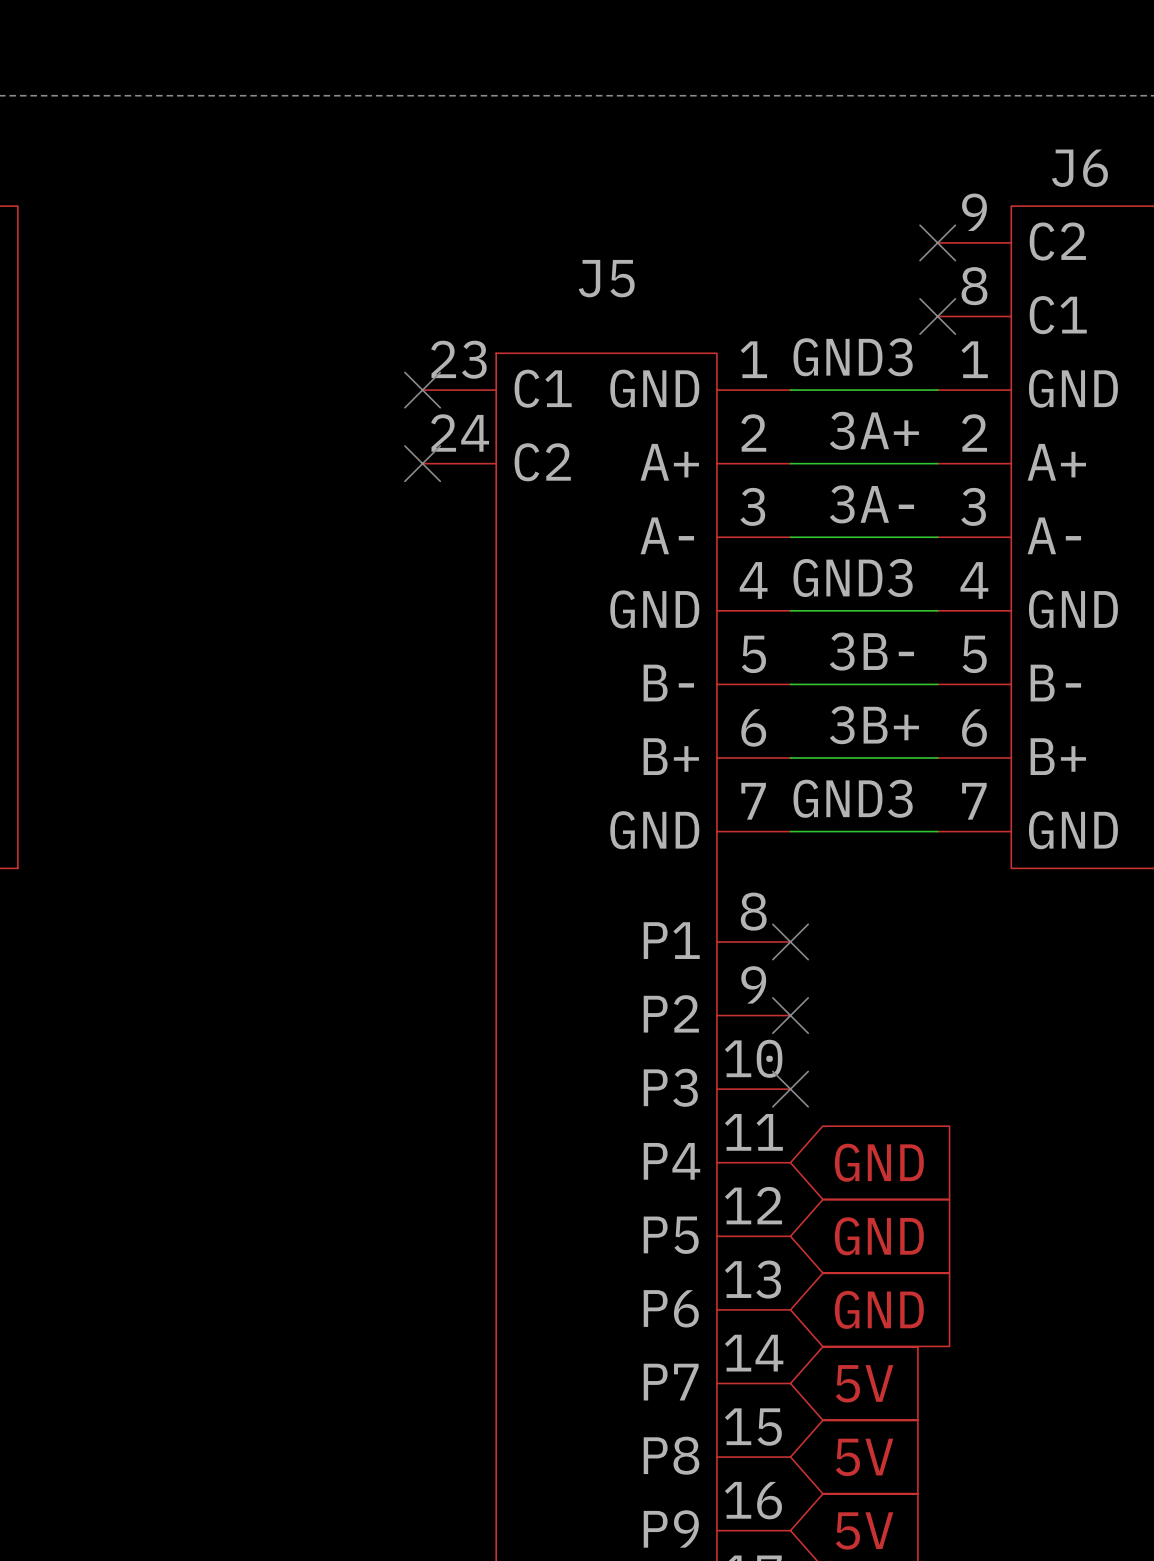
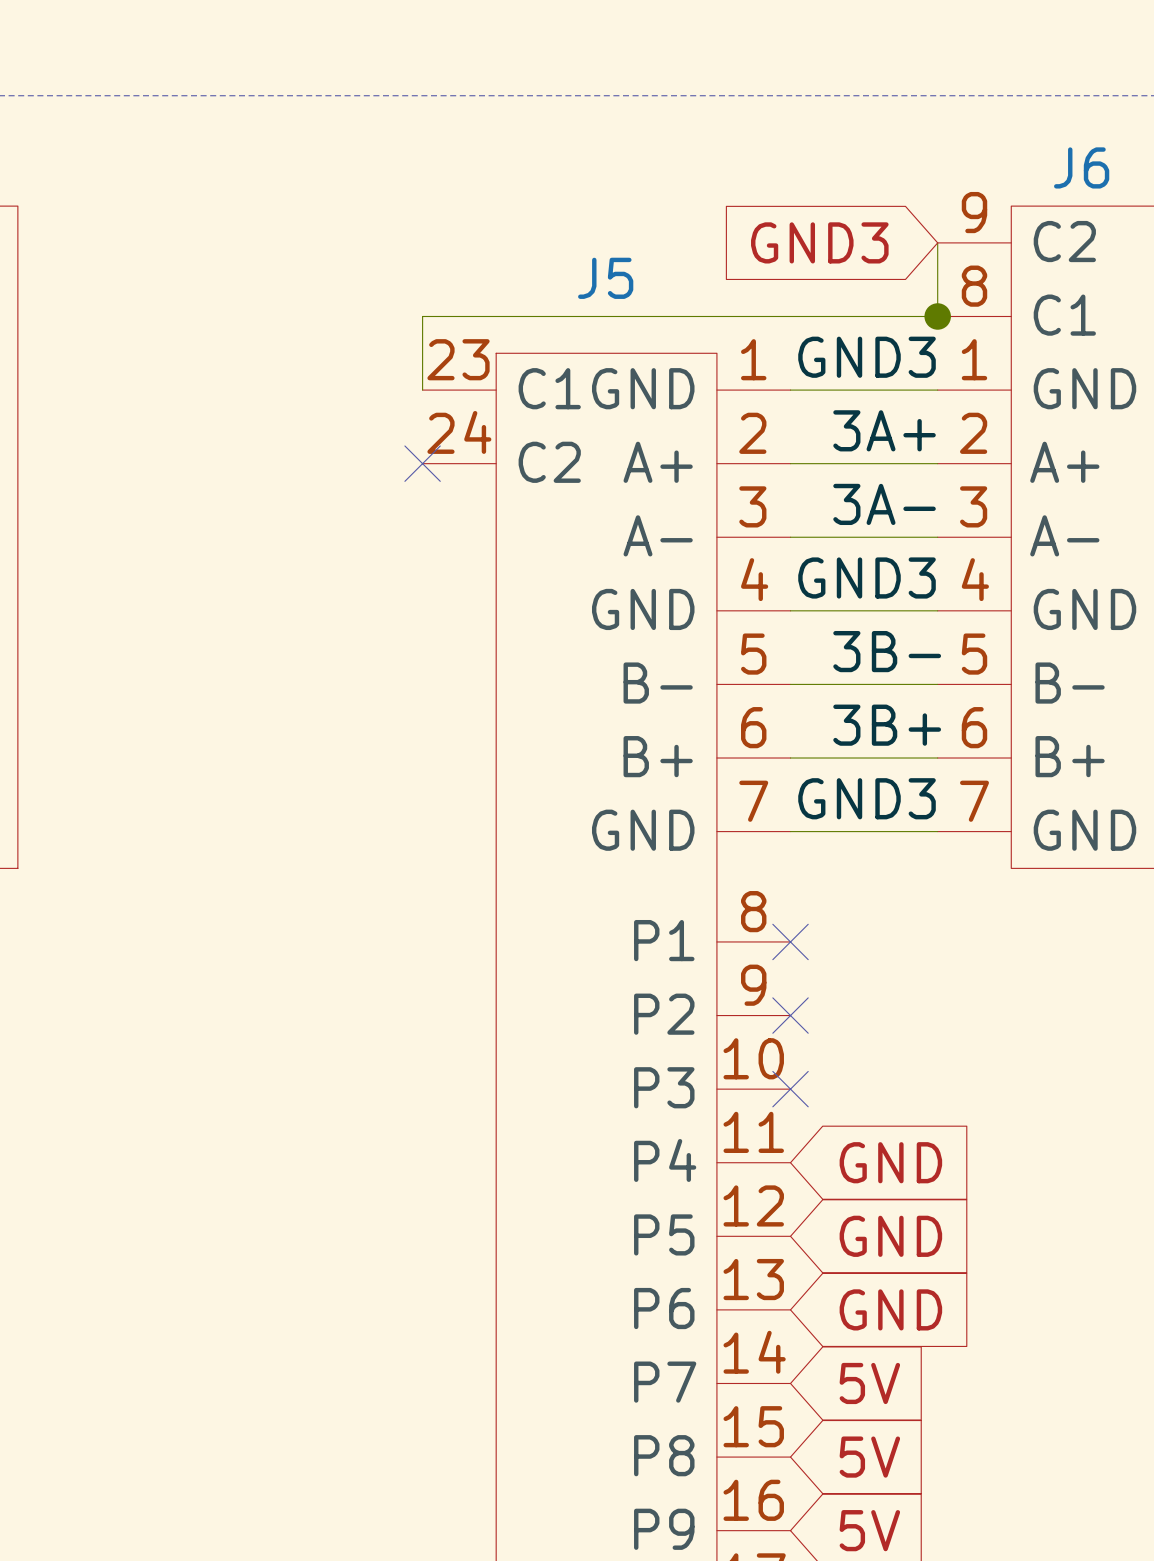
global label: none -> GND3 (819, 242)
wire: none -> (937, 242) (937, 316) (422, 316) (422, 390)
no-connect mark: (937, 242) -> none
no-connect mark: (937, 316) -> none
junction: none -> (937, 316)
no-connect mark: (422, 390) -> none

